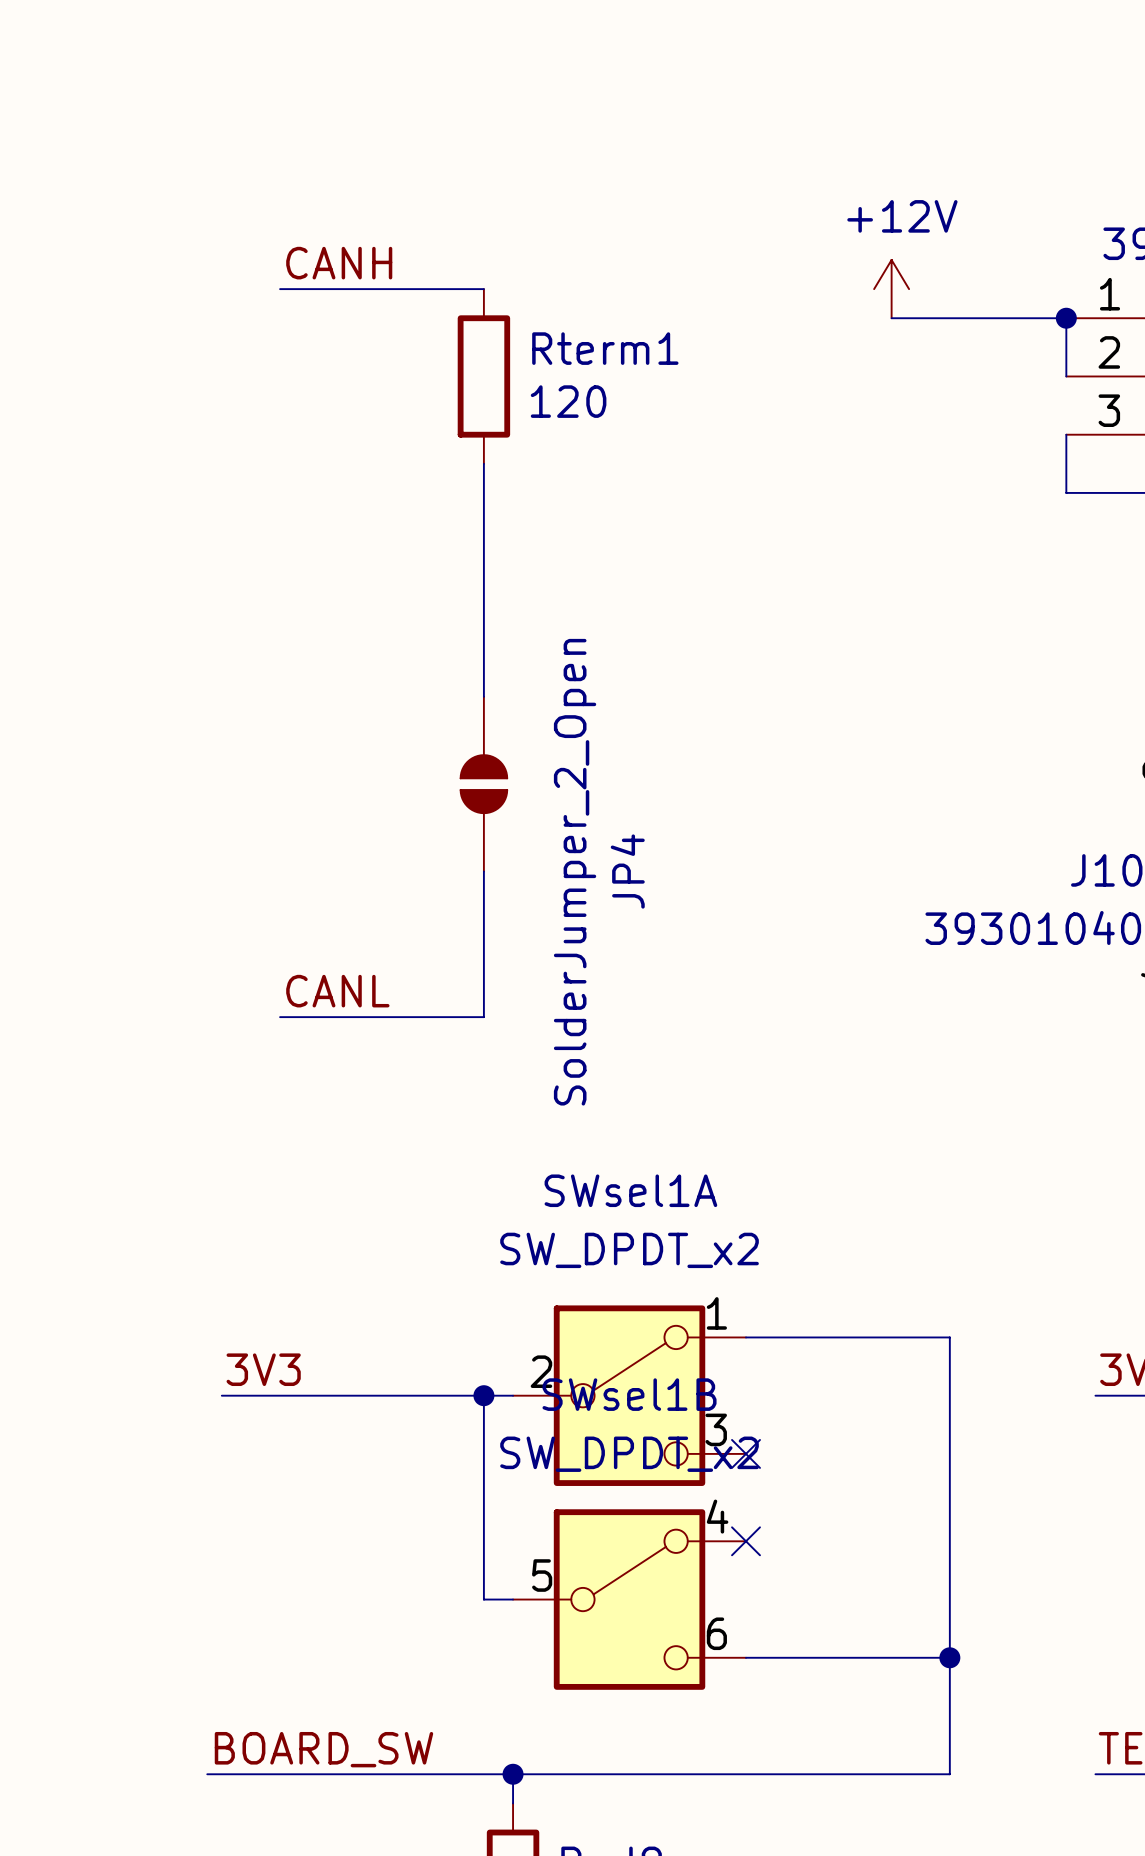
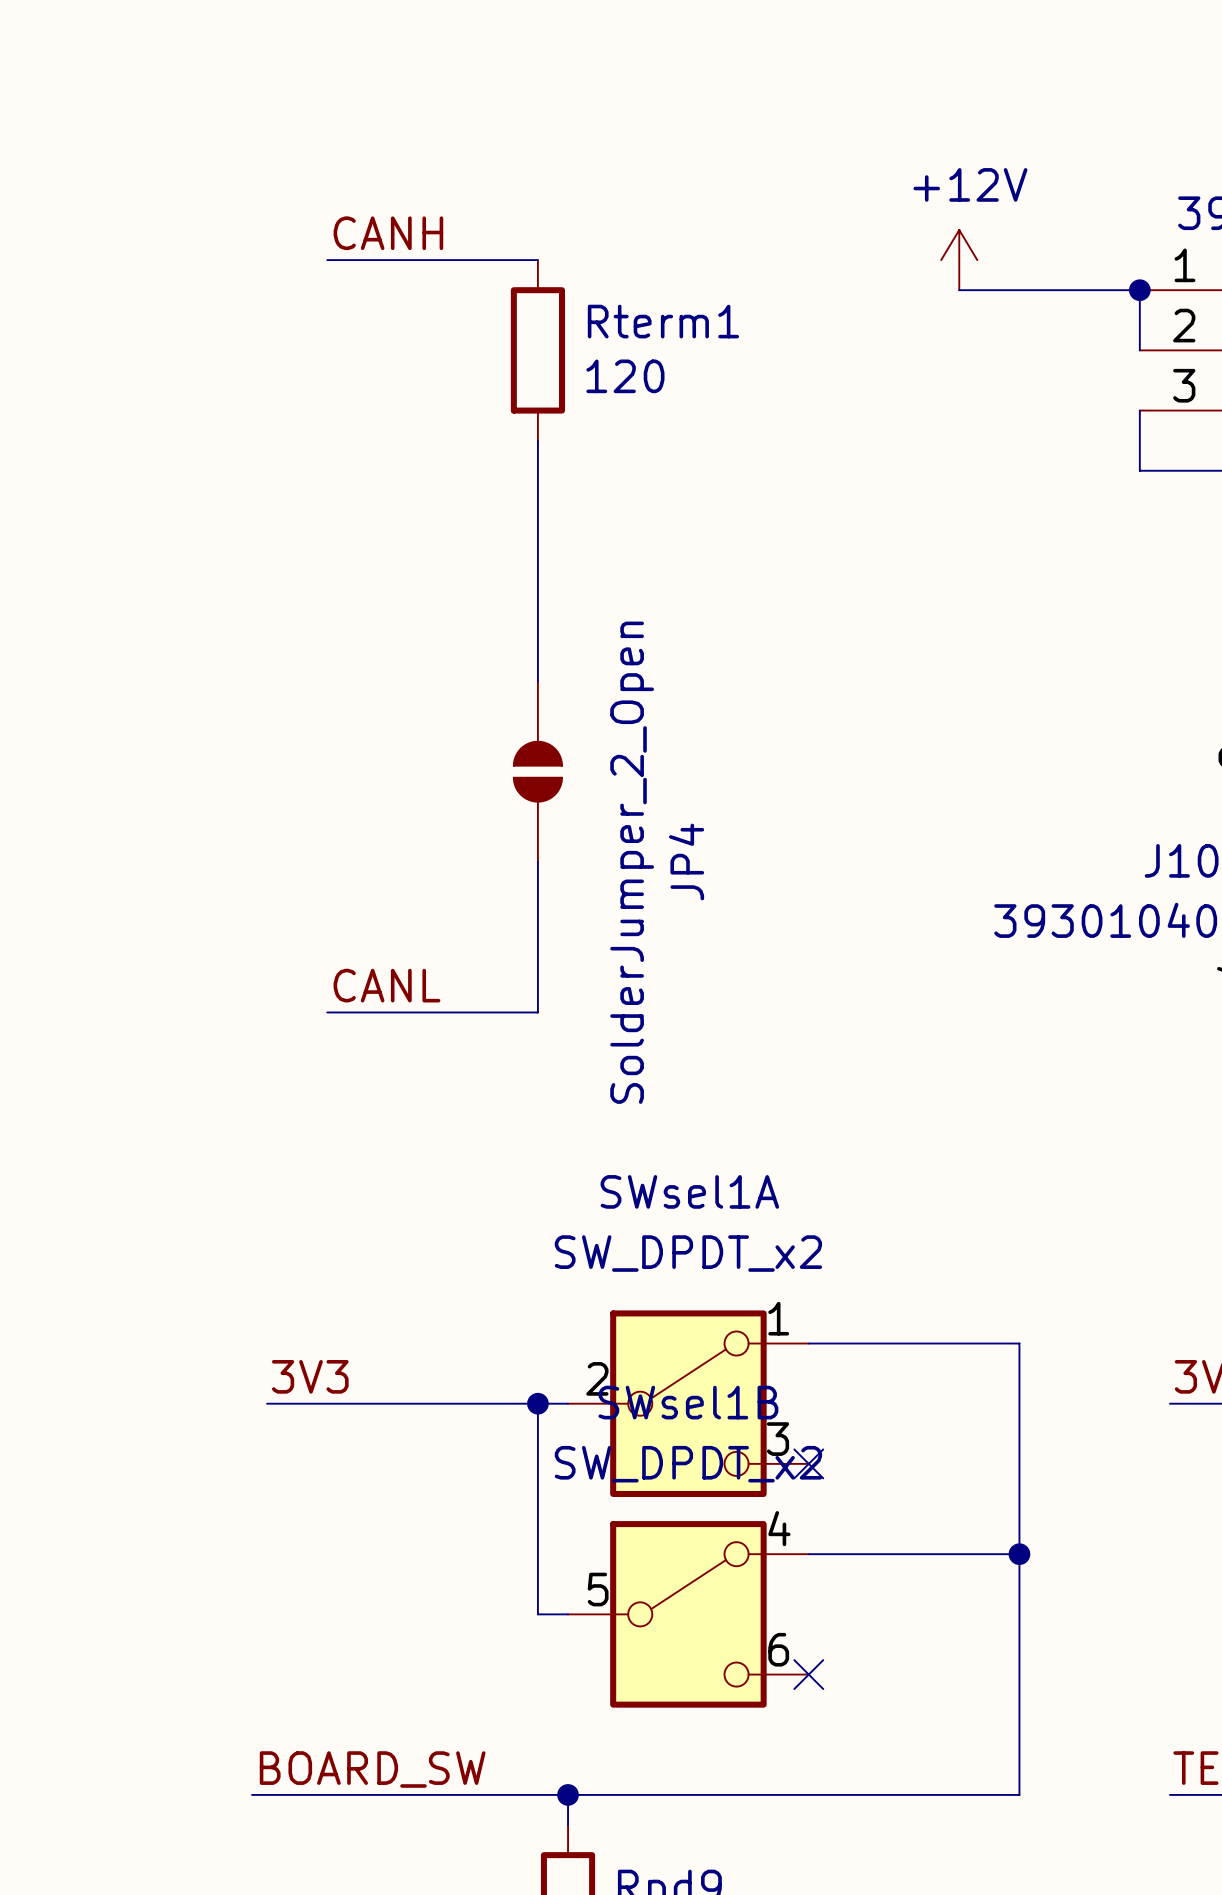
no-connect mark position: (746, 1541) -> (808, 1674)
wire: (746, 1657) (949, 1657) -> (808, 1554) (1019, 1554)
junction position: (949, 1657) -> (1019, 1554)

